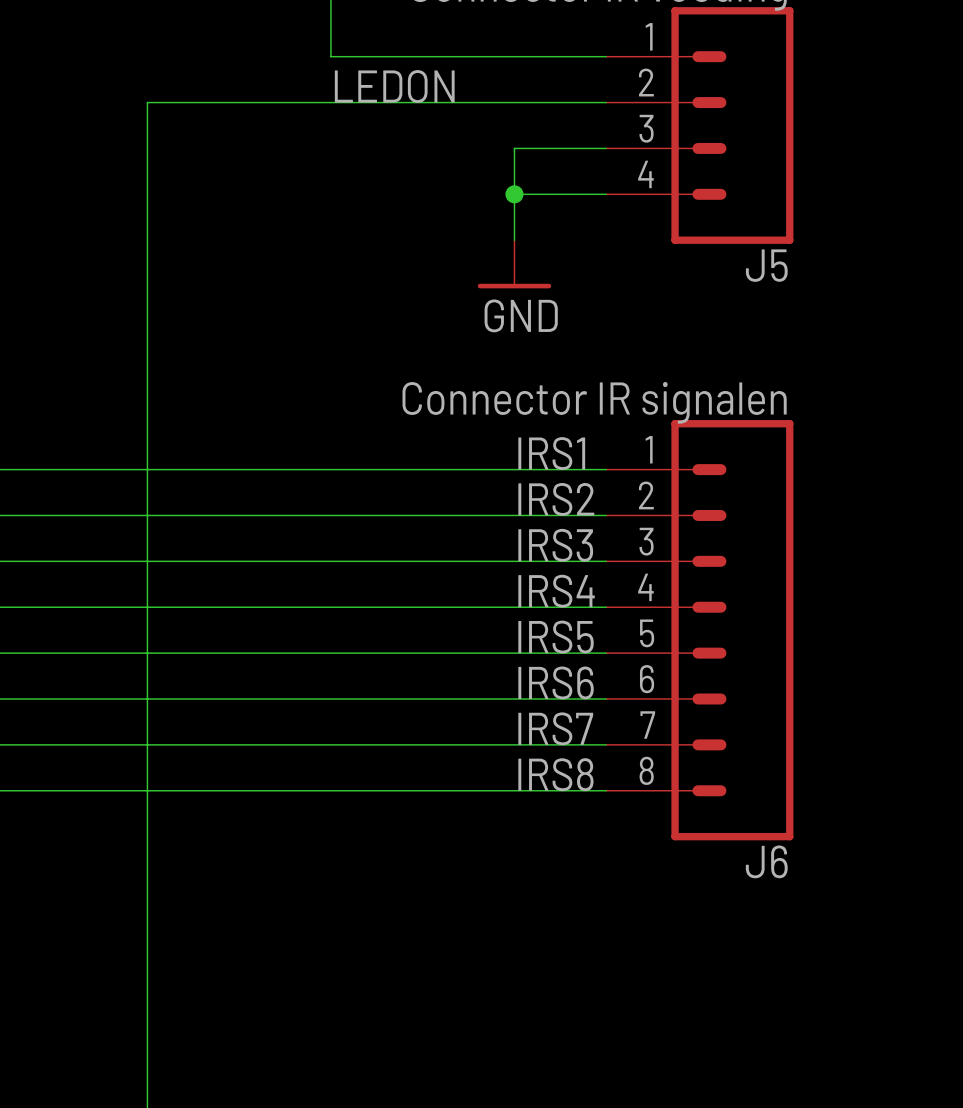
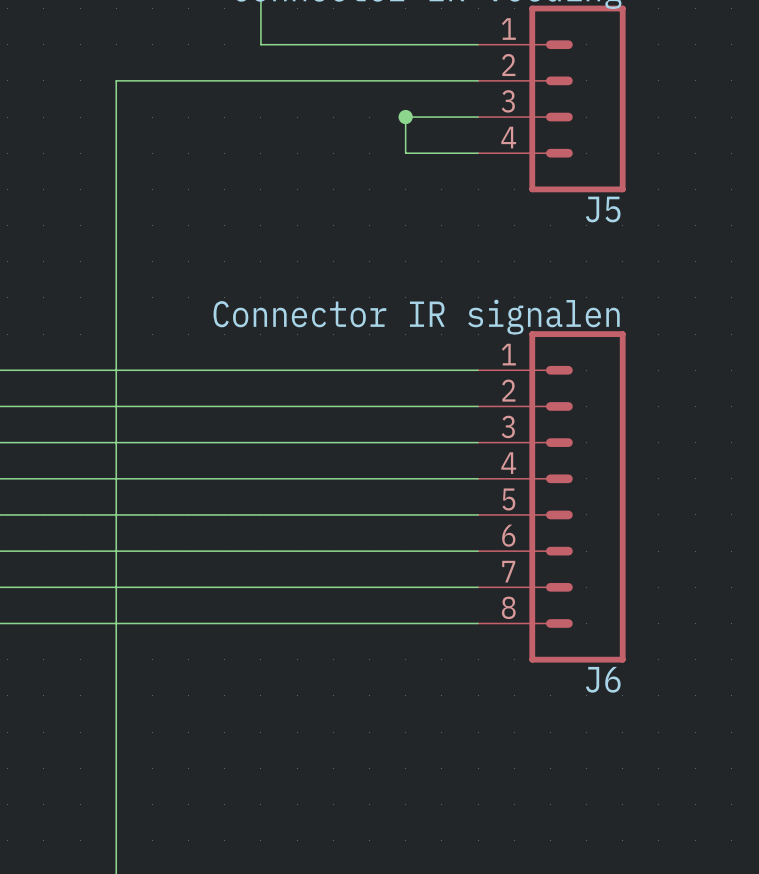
label: LEDON (394, 86) -> none
wire: (514, 194) (514, 240) -> none
junction position: (514, 194) -> (405, 117)
power symbol: GND (514, 264) -> none
label: IRS1 (551, 453) -> none
label: IRS2 (556, 499) -> none
label: IRS3 (555, 545) -> none
label: IRS4 (556, 591) -> none
label: IRS5 (556, 637) -> none
label: IRS6 (556, 682) -> none
label: IRS7 (555, 728) -> none
label: IRS8 (555, 774) -> none

